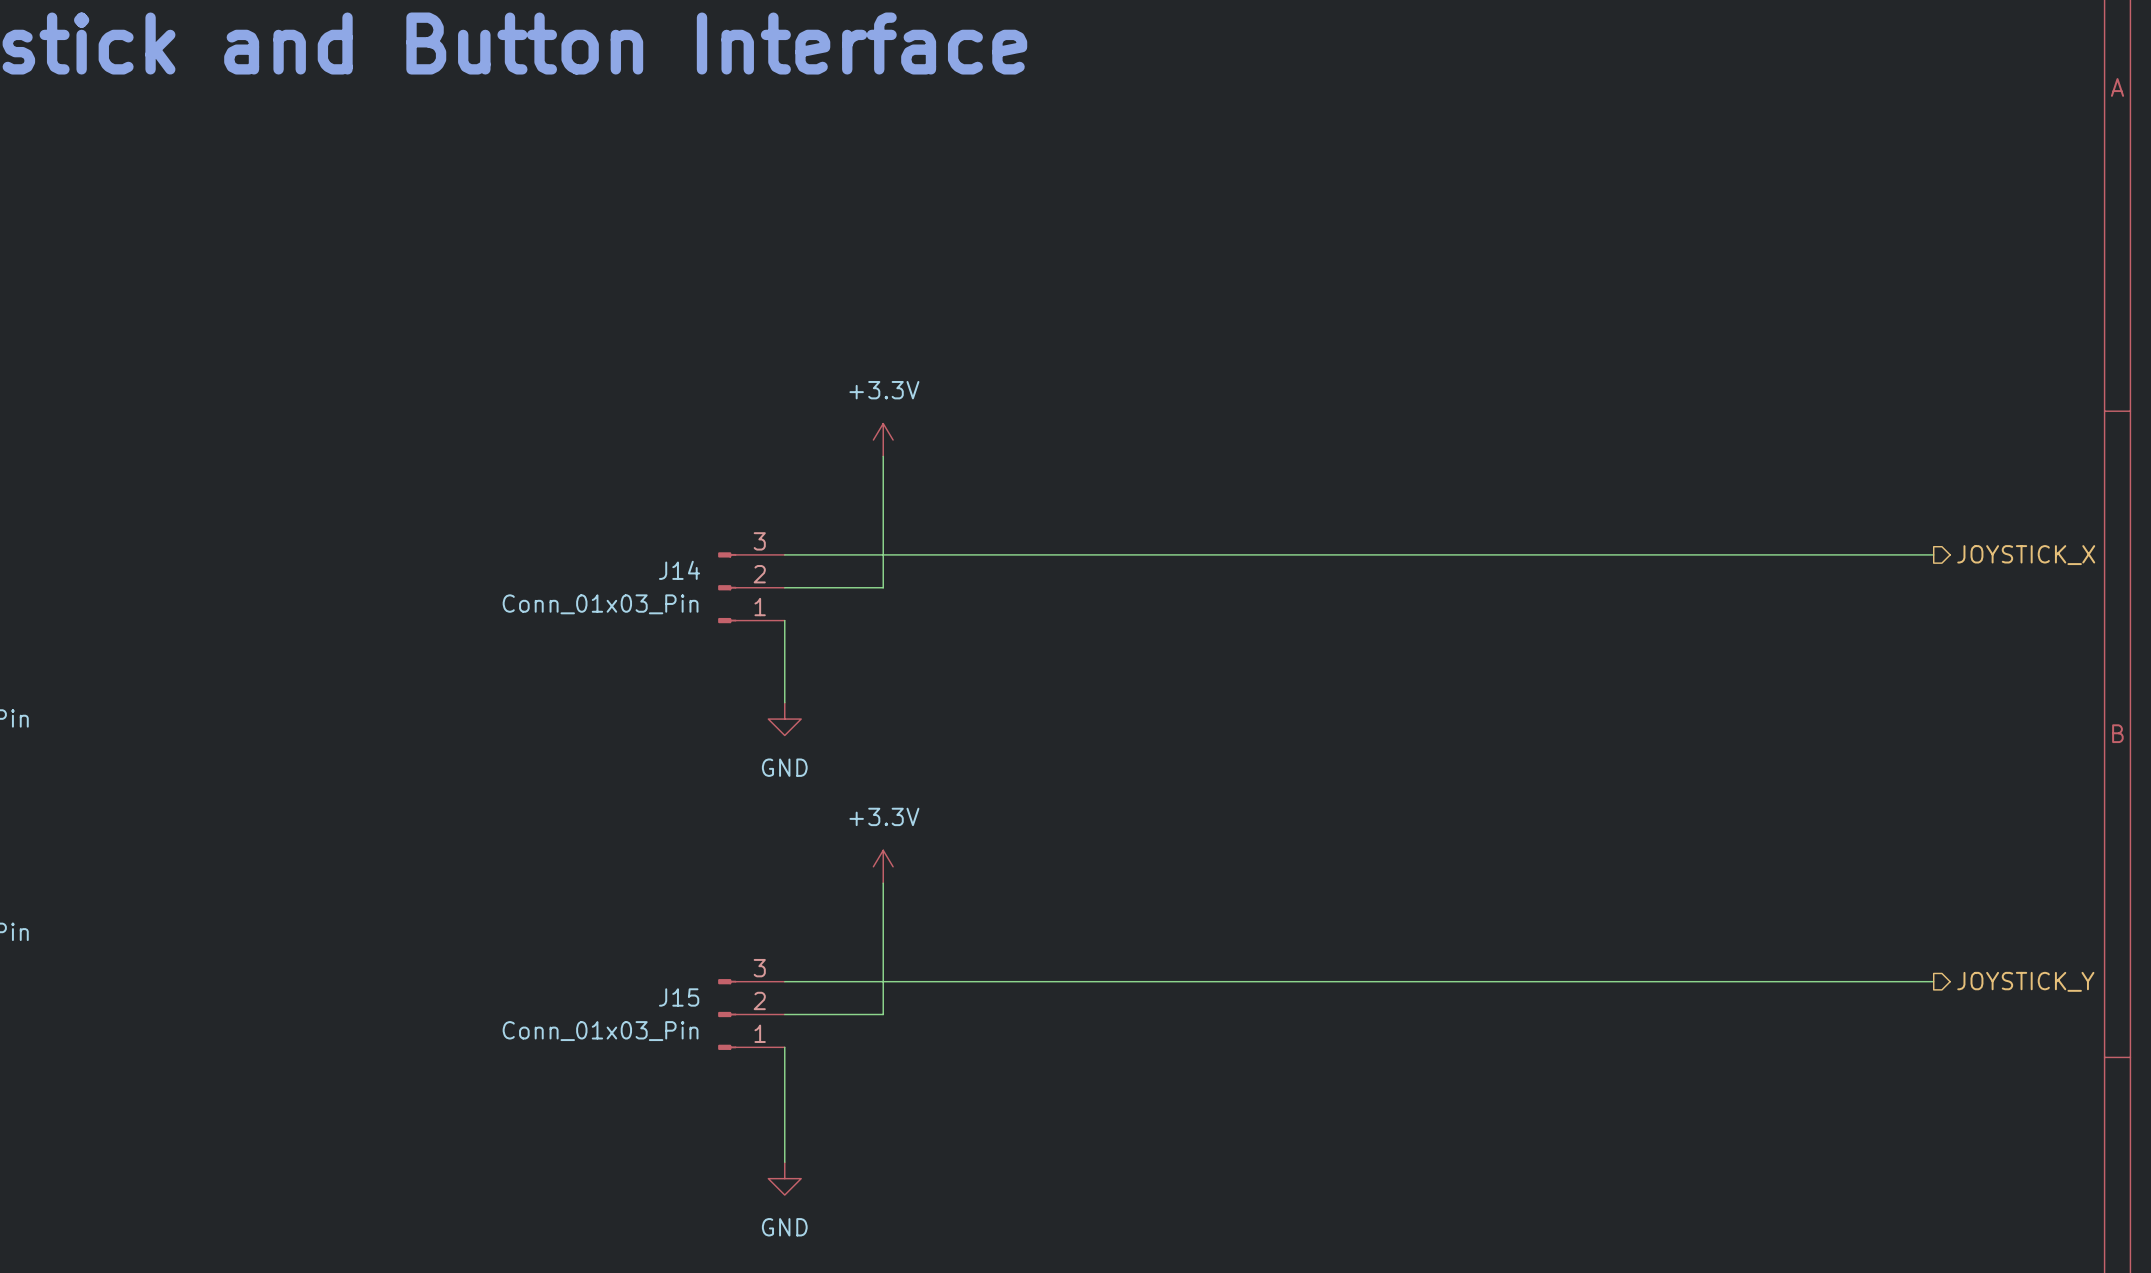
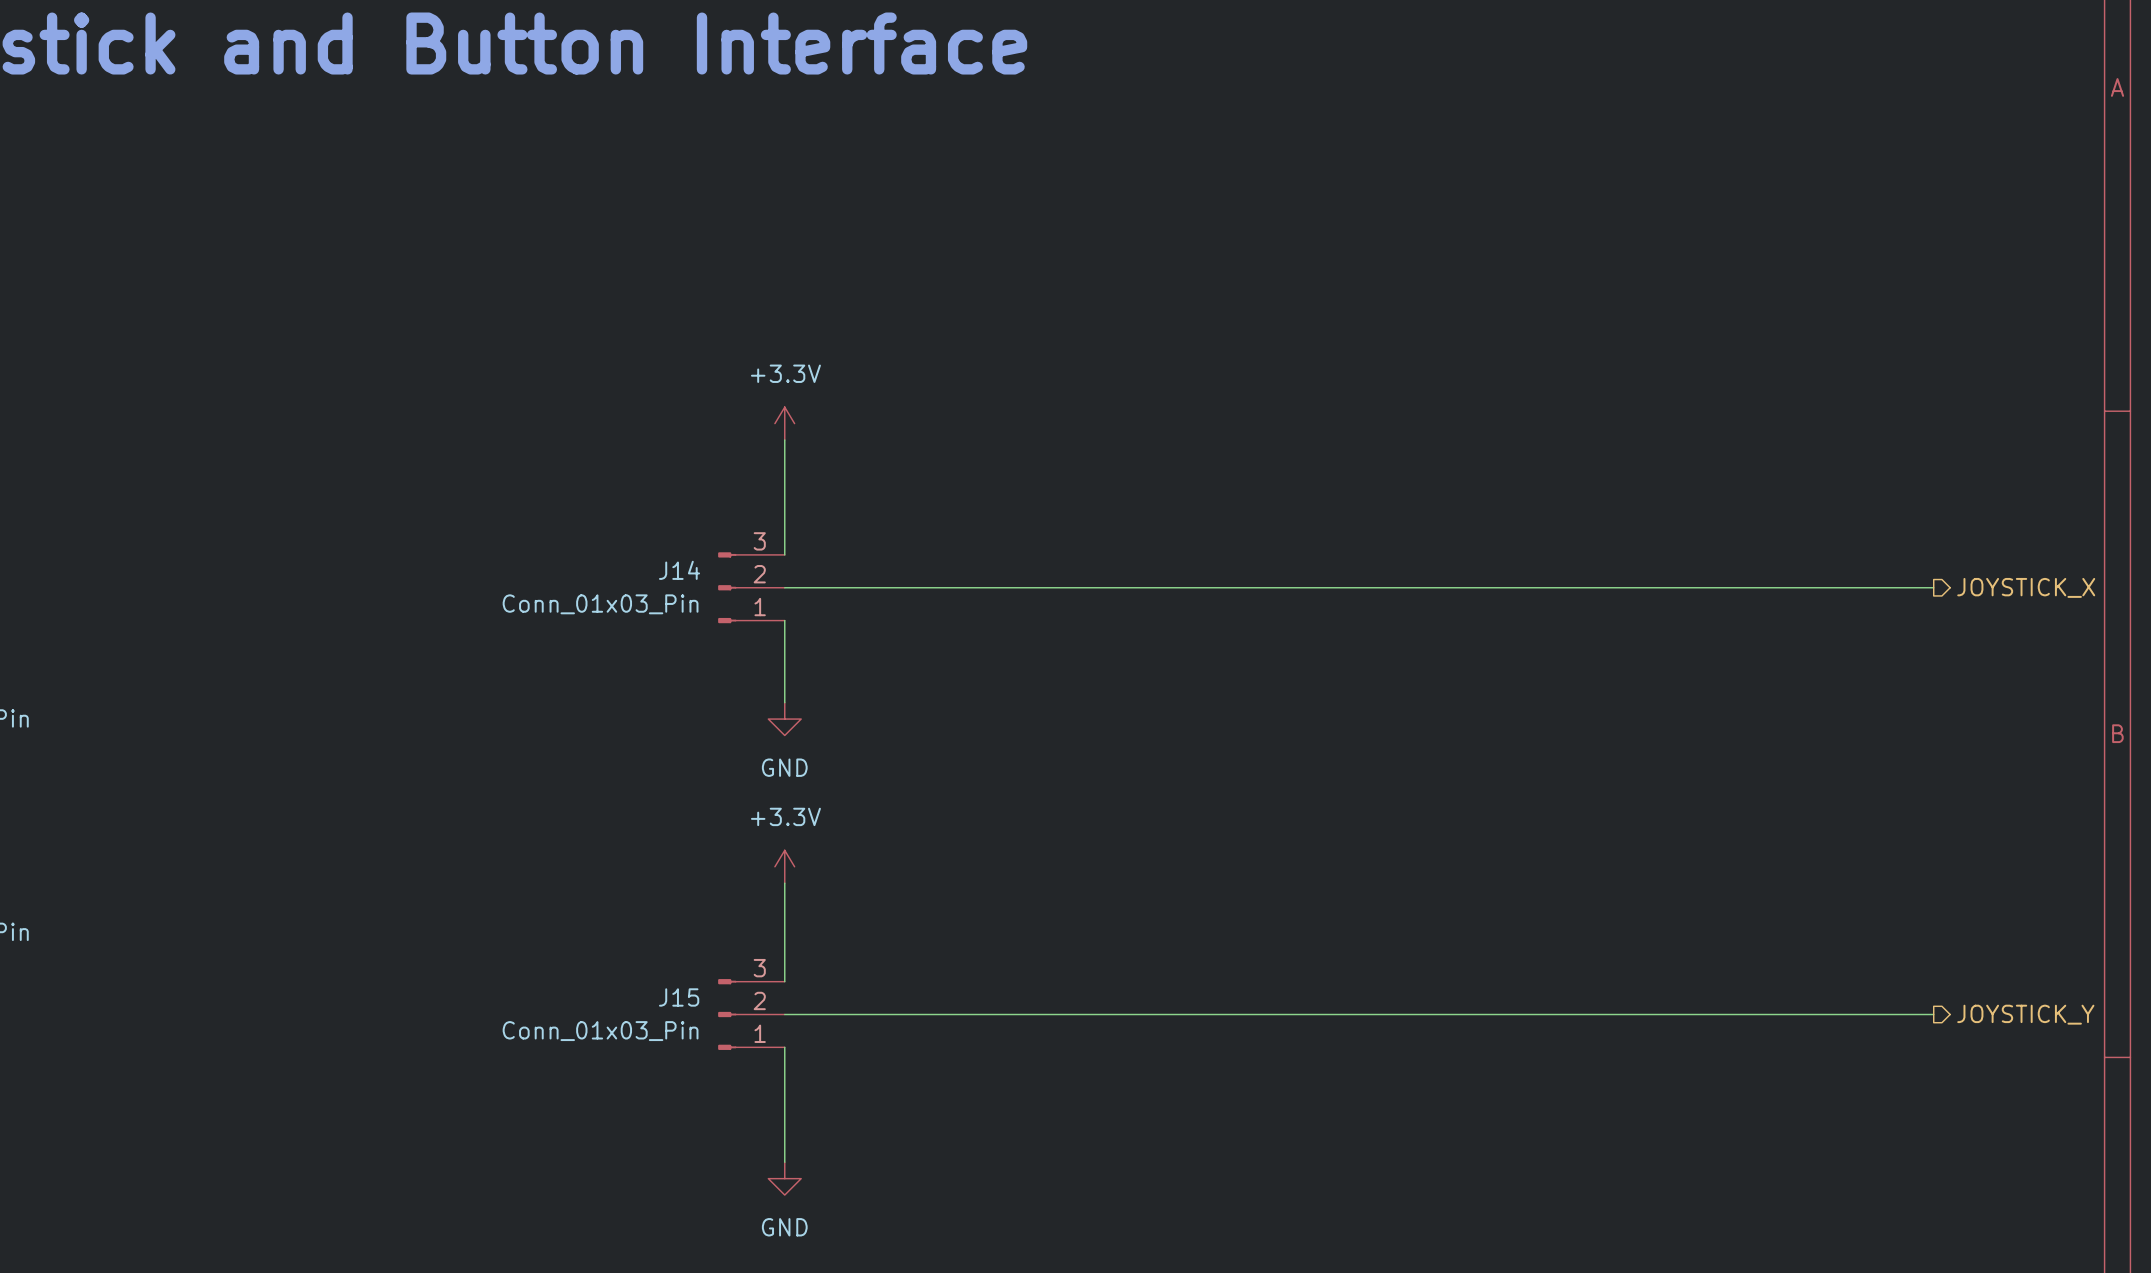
power symbol position: +3.3V (883, 440) -> +3.3V (784, 423)
wire: (883, 456) (883, 587) -> (1933, 587) (883, 587)
wire: (784, 554) (1933, 554) -> (784, 554) (784, 440)
hierarchical label position: JOYSTICK_X (2026, 555) -> JOYSTICK_X (2026, 587)
power symbol position: +3.3V (883, 866) -> +3.3V (784, 866)
wire: (883, 883) (883, 1014) -> (1933, 1014) (883, 1014)
wire: (784, 981) (1933, 981) -> (784, 981) (784, 883)
hierarchical label position: JOYSTICK_Y (2025, 981) -> JOYSTICK_Y (2025, 1014)

